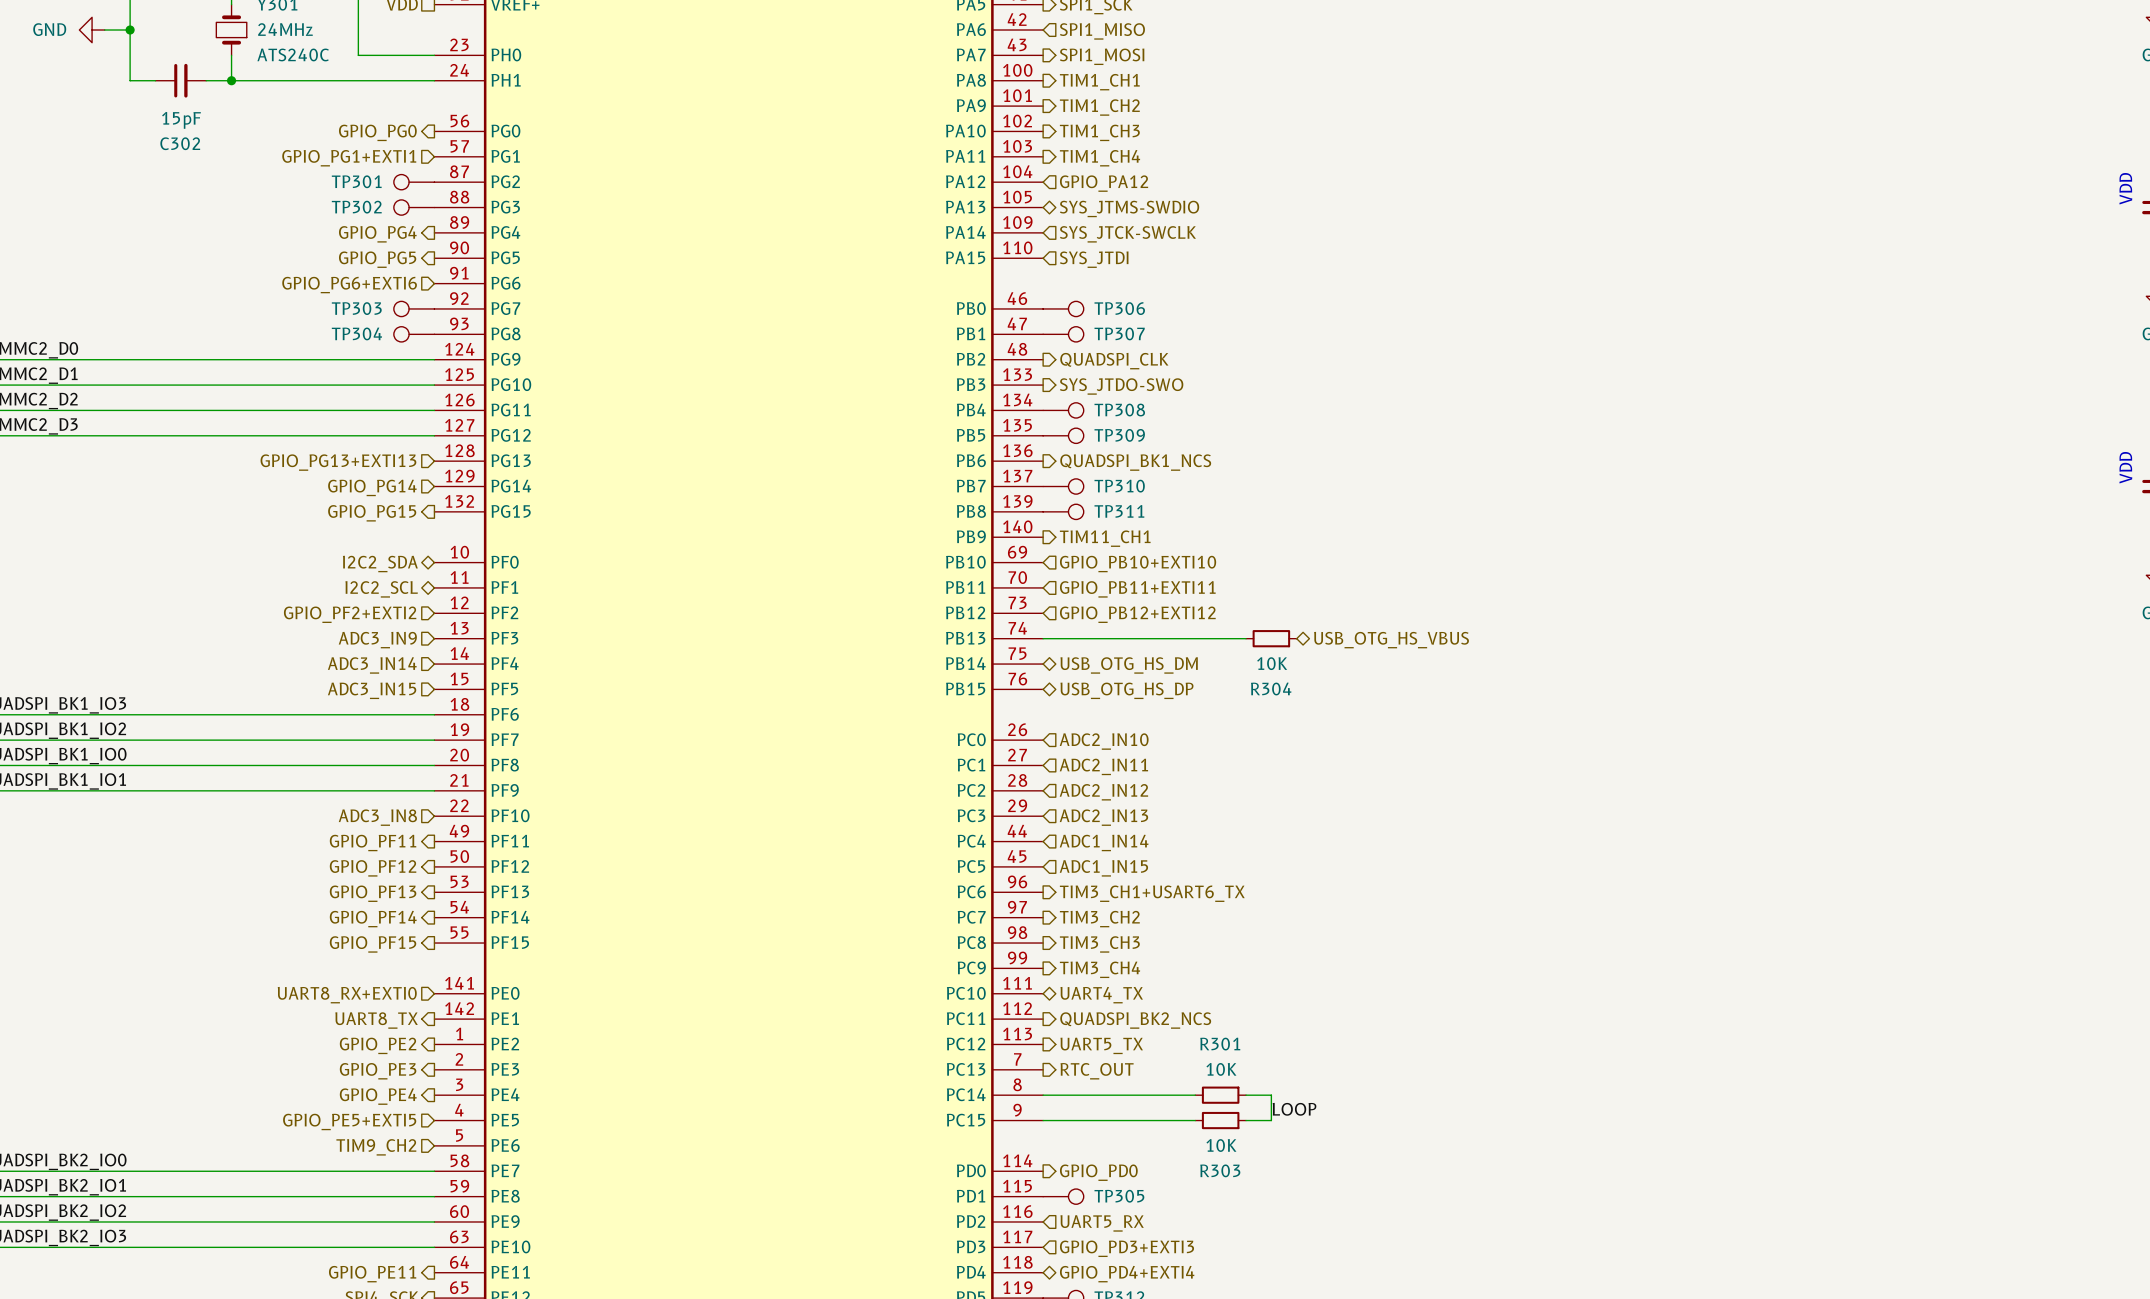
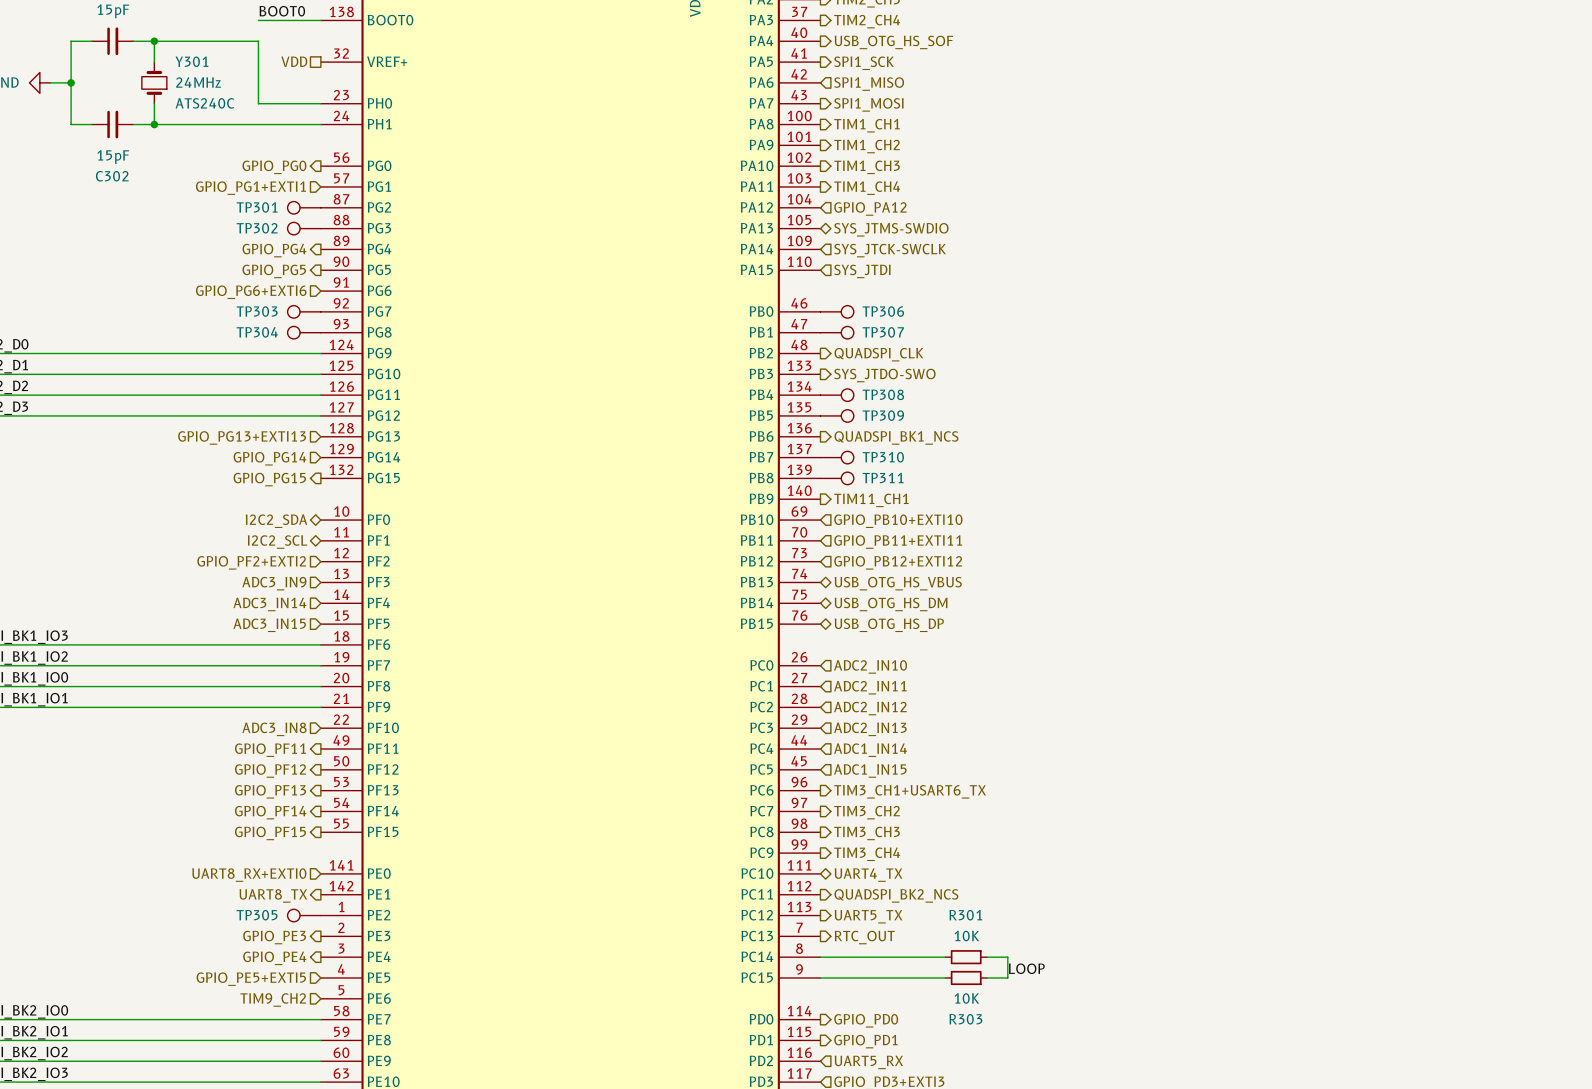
wire: (1043, 638) (1246, 638) -> none
R304: 10K (1271, 638) -> none
hierarchical label: none -> USB_OTG_HS_VBUS (898, 583)
hierarchical label: USB_OTG_HS_VBUS (1391, 640) -> none
hierarchical label: GPIO_PE2 (378, 1045) -> none
TP305 position: (1063, 1196) -> (304, 915)
TP305 rotation: 0° (1076, 1196) -> 180° (293, 915)
hierarchical label: none -> GPIO_PD1 (866, 1041)

